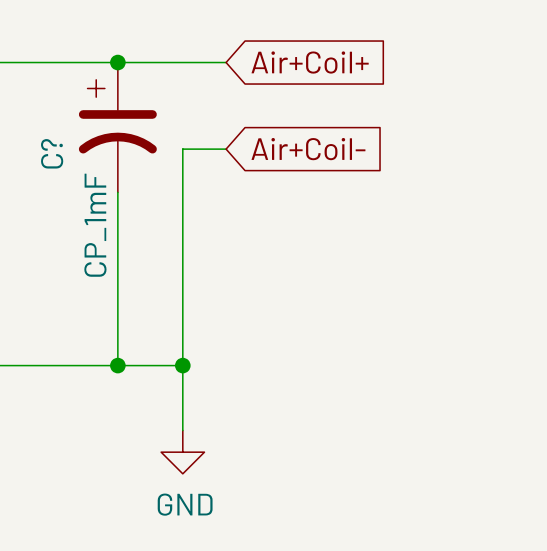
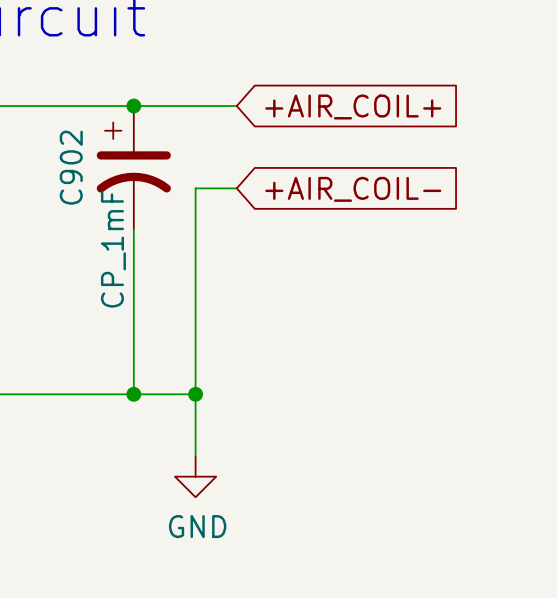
global label: Air+Coil+ (310, 62) -> +AIR_COIL+ (353, 107)
global label: Air+Coil- (308, 149) -> +AIR_COIL- (353, 189)
C? name: C? (52, 153) -> C902 (71, 167)

